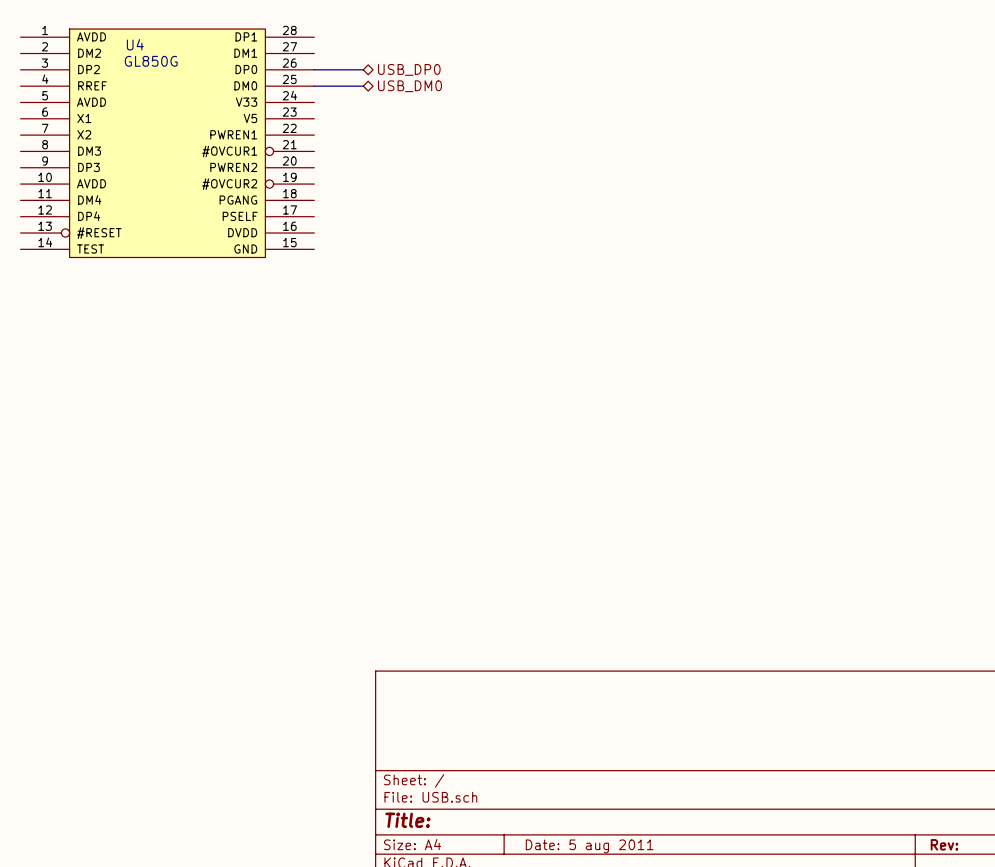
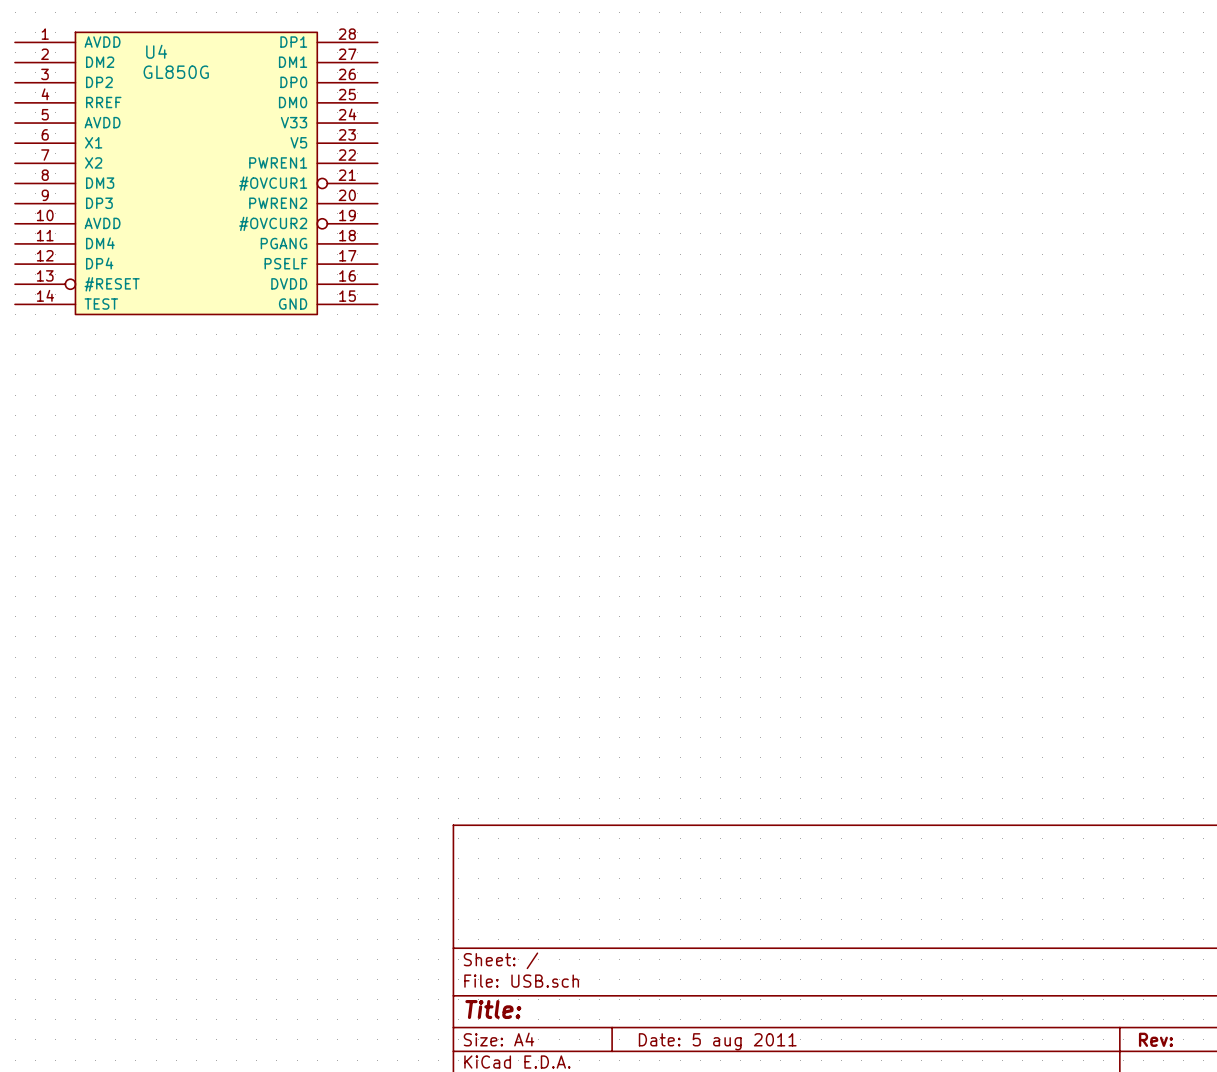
wire: (314, 69) (363, 69) -> none
hierarchical label: USB_DP0 (409, 69) -> none
wire: (314, 86) (363, 86) -> none
hierarchical label: USB_DM0 (409, 86) -> none

